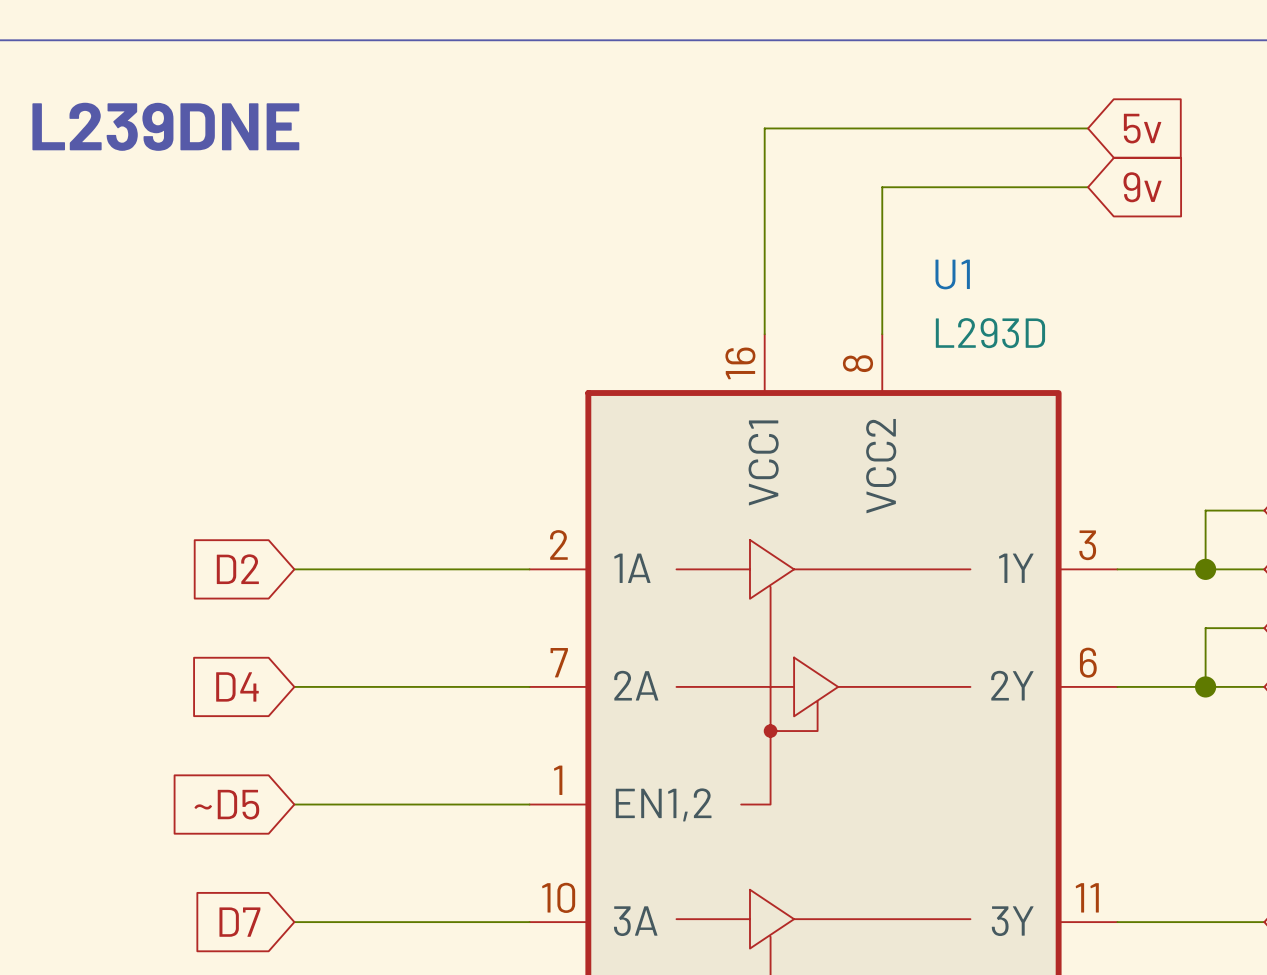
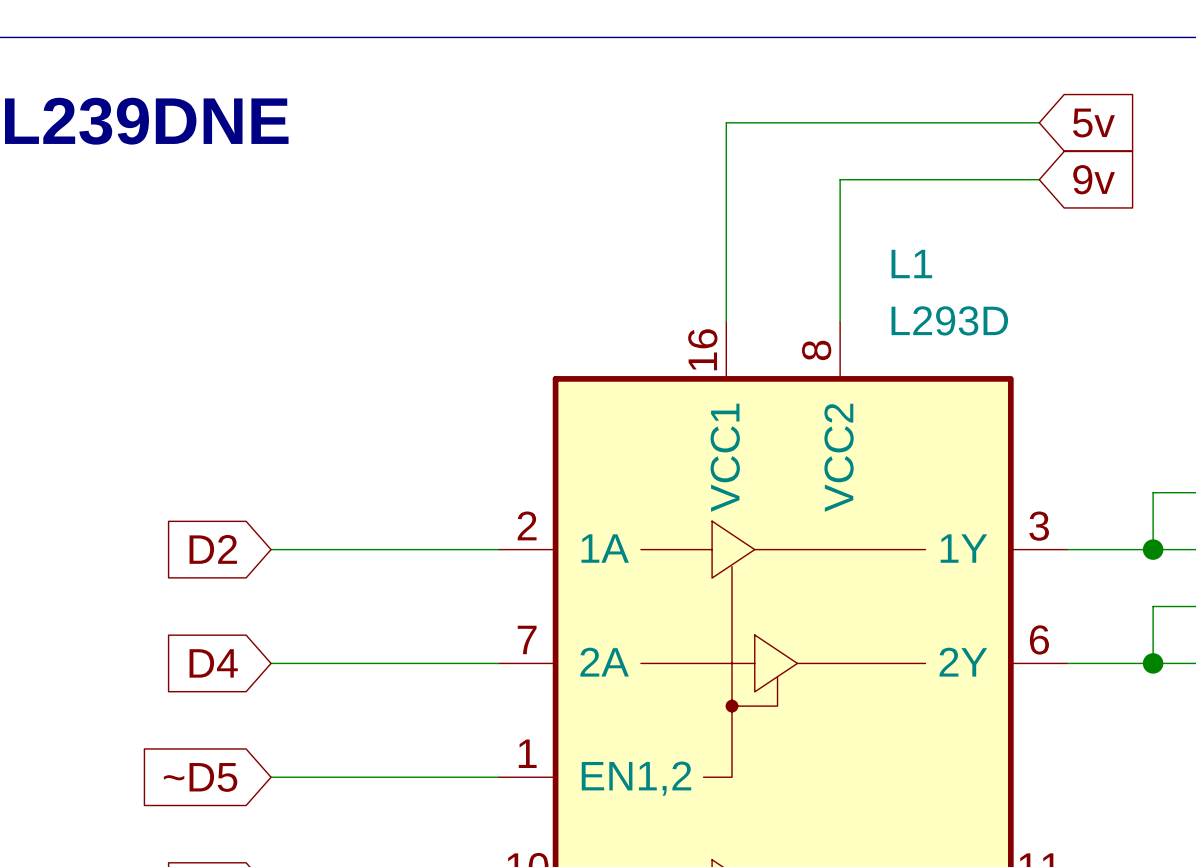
U1 name: U1 (952, 274) -> L1 (911, 264)

